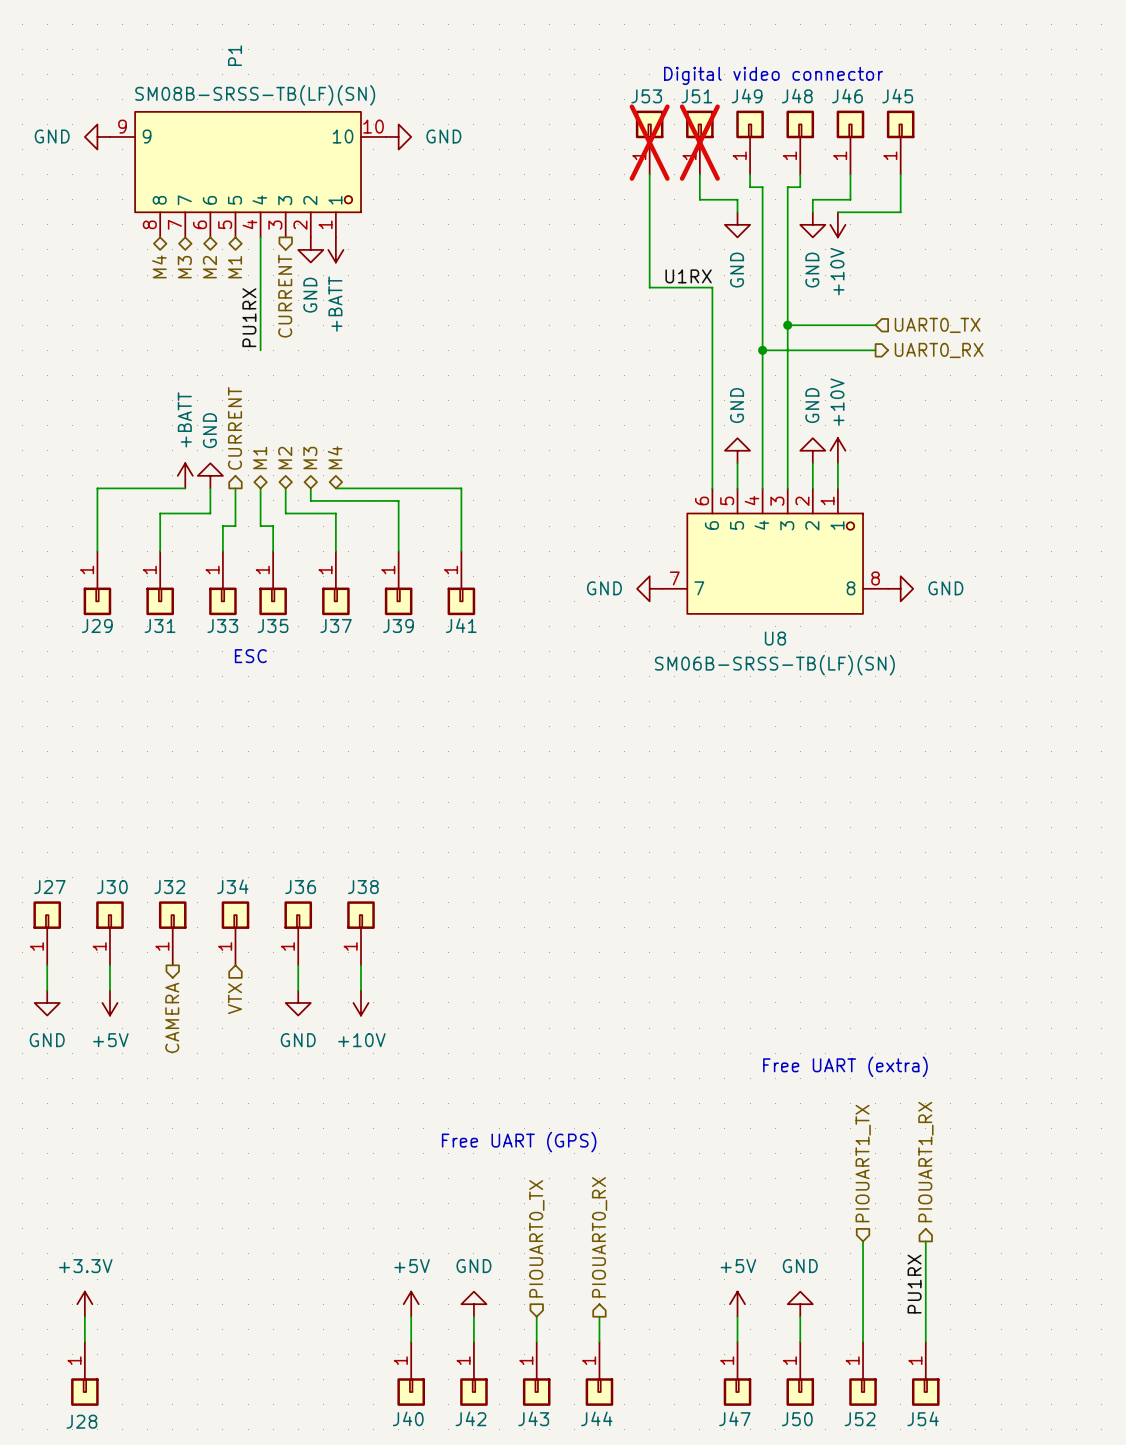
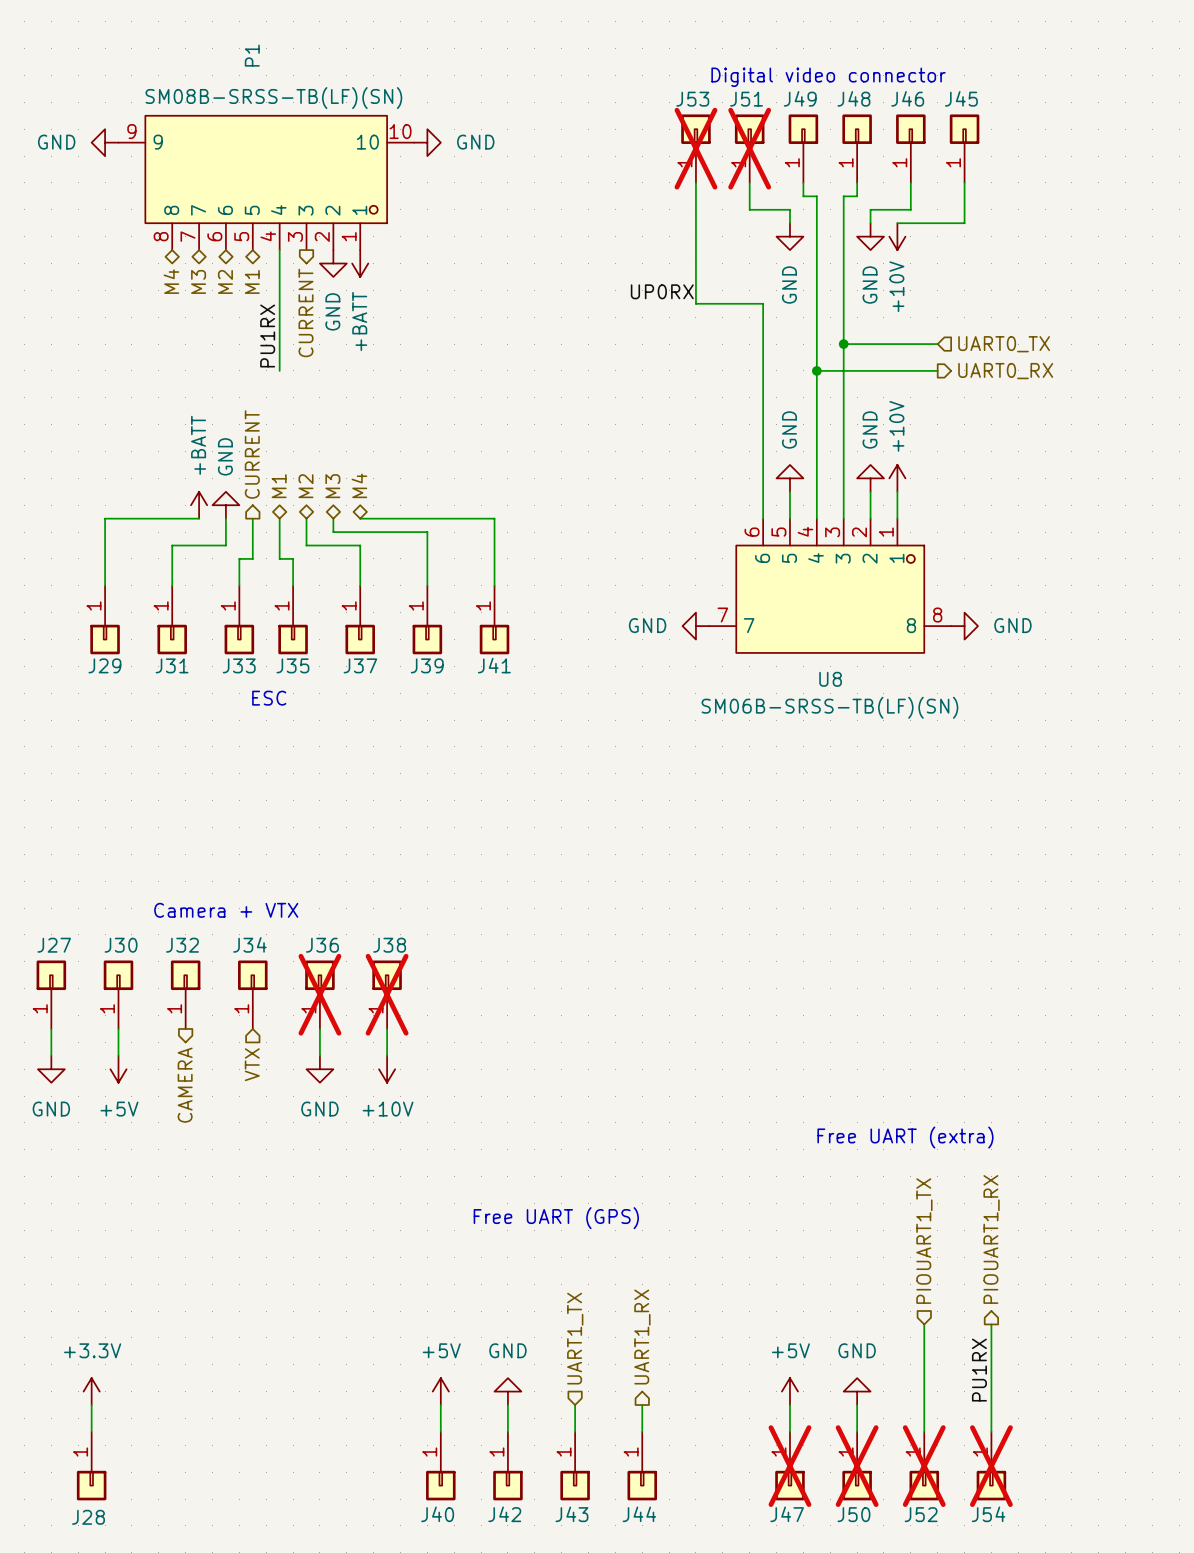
label: none -> UP0RX (662, 291)
label: U1RX (688, 276) -> none
text: none -> Camera + VTX (226, 910)
J36 do-not-place cross: none -> (319, 994)
J38 do-not-place cross: none -> (387, 994)
hierarchical label: PIOUART0_RX (599, 1237) -> UART1_RX (642, 1337)
hierarchical label: PIOUART0_TX (536, 1238) -> UART1_TX (575, 1338)
J47 do-not-place cross: none -> (789, 1466)
J50 do-not-place cross: none -> (857, 1466)
J52 do-not-place cross: none -> (924, 1466)
J54 do-not-place cross: none -> (991, 1466)

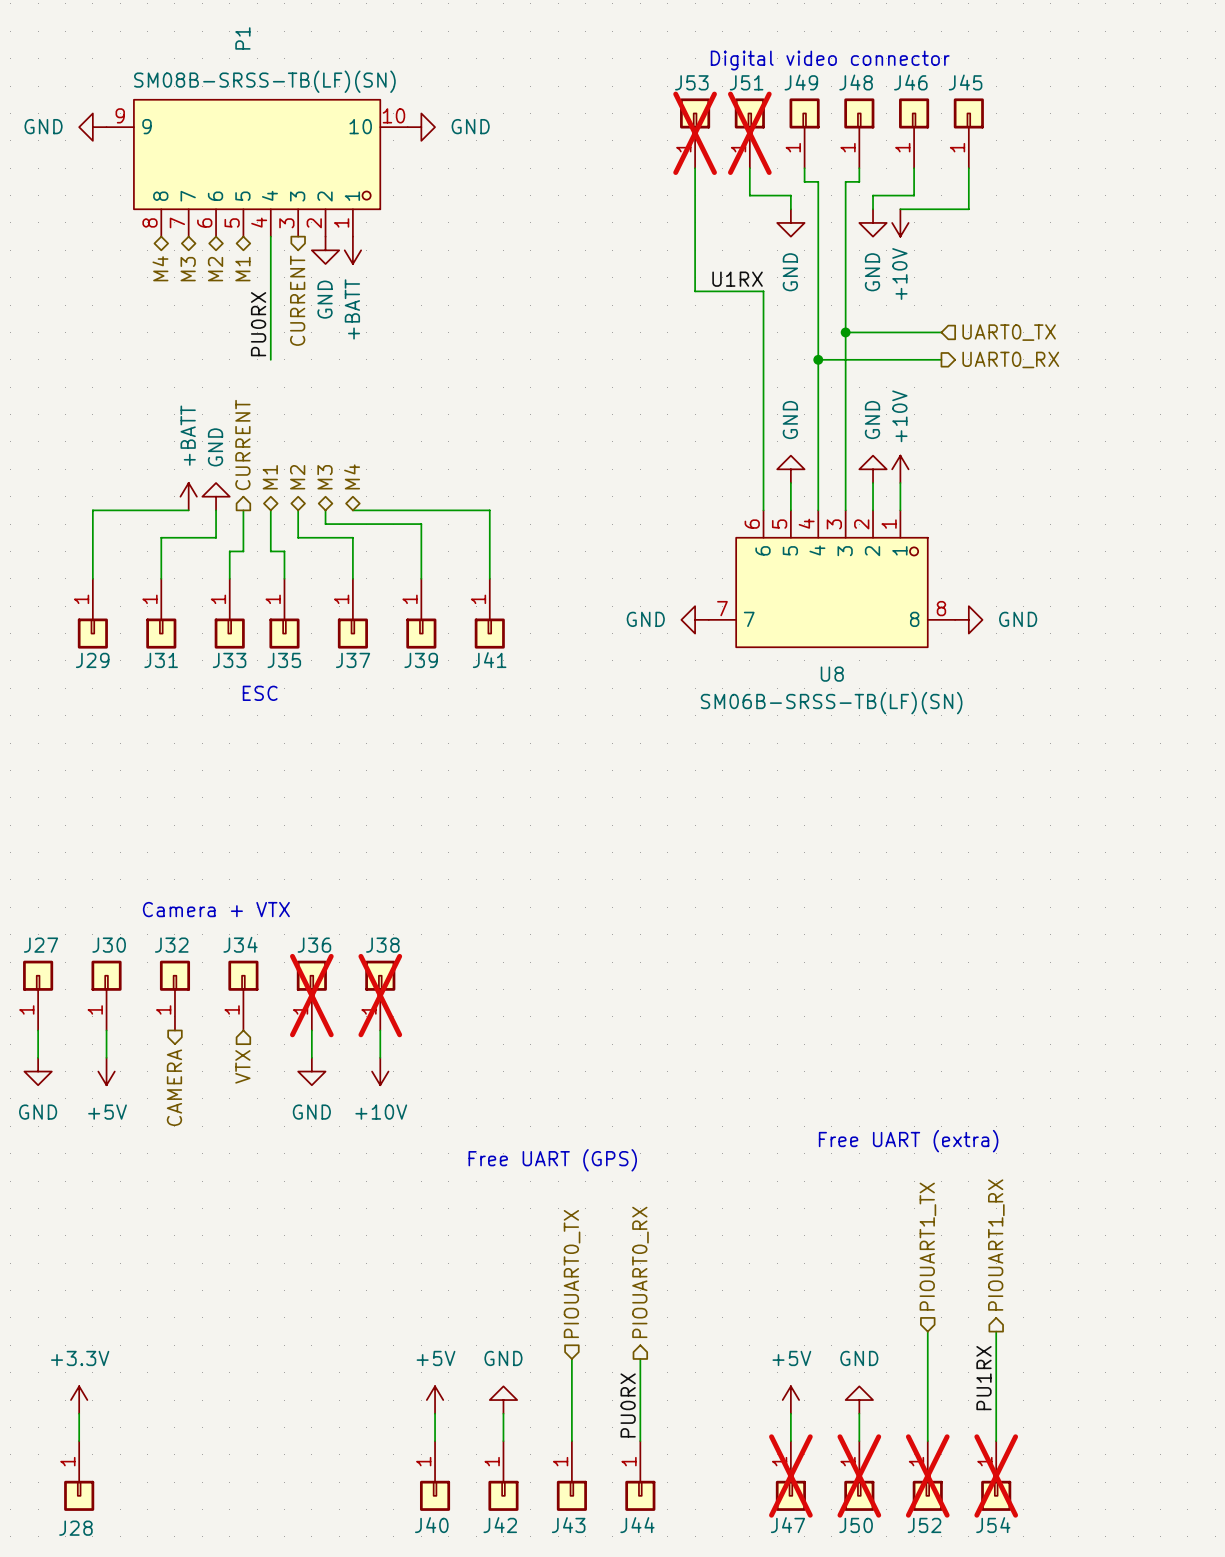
label: UP0RX (662, 291) -> none
label: none -> U1RX (737, 279)
label: PU1RX (267, 335) -> PU0RX (258, 324)
text position: Free UART (GPS) (556, 1218) -> Free UART (GPS) (552, 1160)
hierarchical label: UART1_RX (642, 1337) -> PIOUART0_RX (640, 1272)
hierarchical label: UART1_TX (575, 1338) -> PIOUART0_TX (572, 1274)
wire: none -> (571, 1358) (571, 1413)
wire: none -> (640, 1358) (640, 1413)
label: none -> PU0RX (628, 1405)

